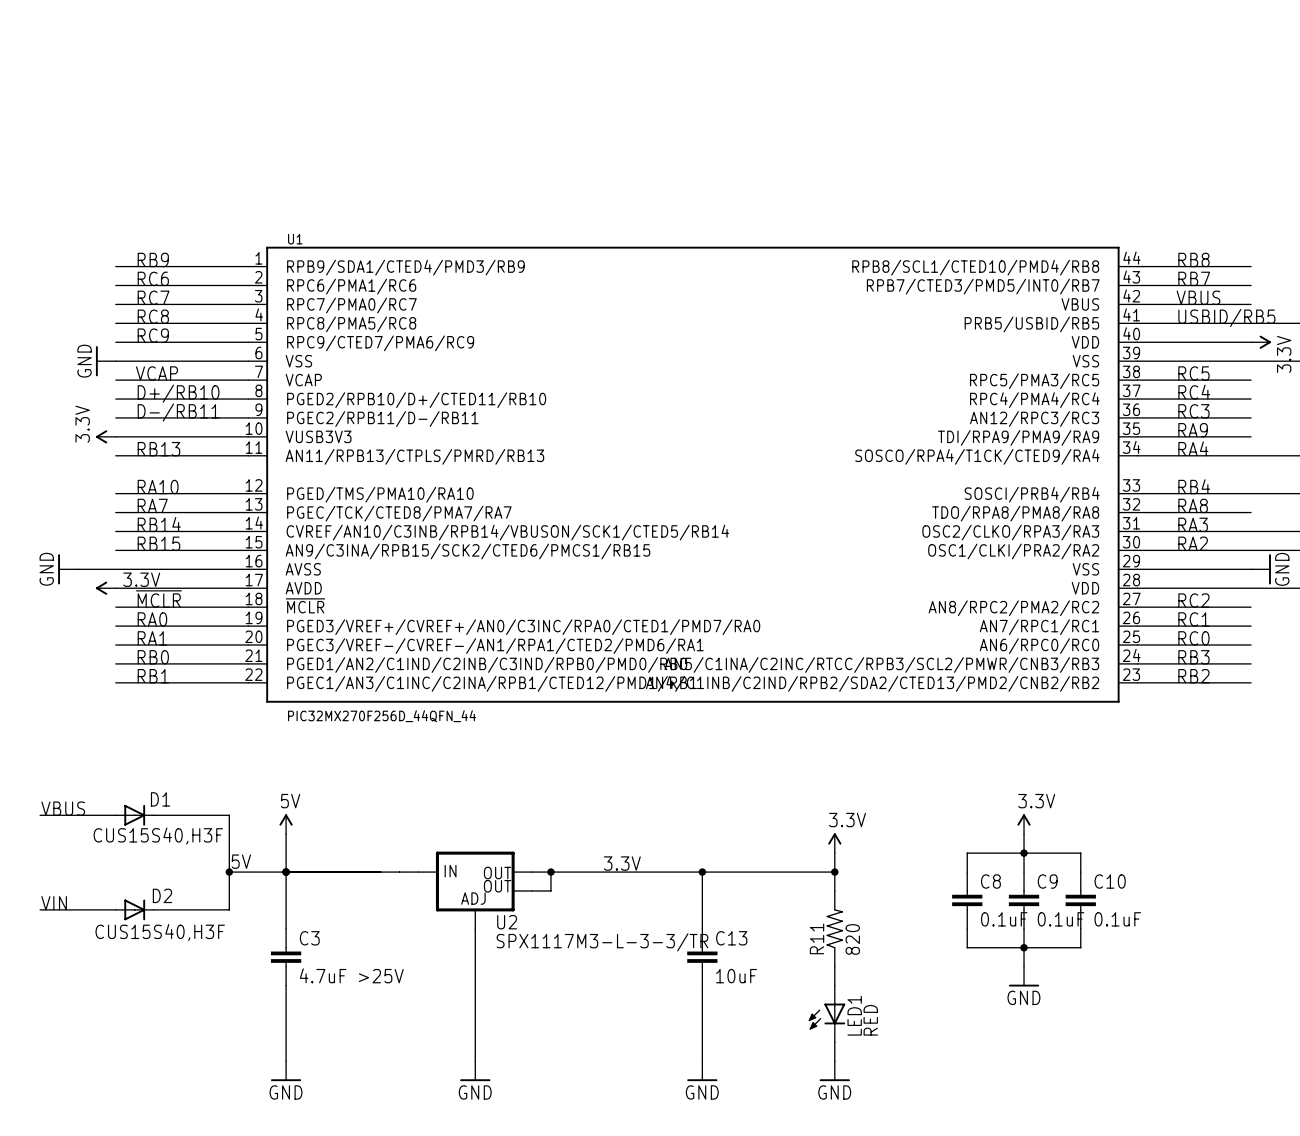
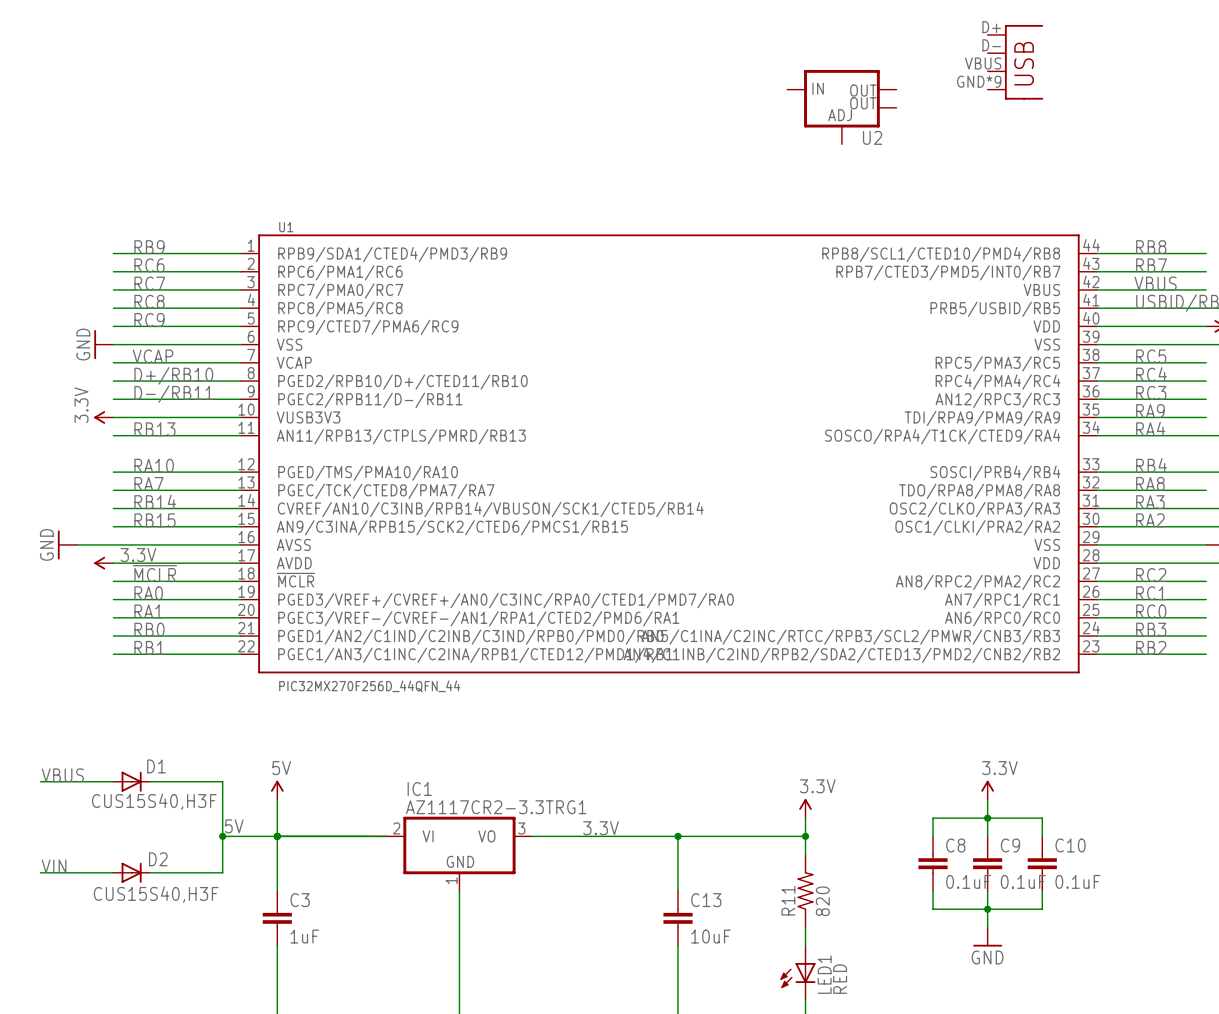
part: none -> (1015, 62)
wire: (532, 872) (550, 872) (550, 890) (532, 890) -> none
junction: (550, 872) -> none
IC1: none -> AZ1117CR2-3.3TRG1 (450, 853)
U2 position: (475, 890) -> (841, 107)
U2 value: SPX1117M3-L-3-3/TR (602, 942) -> none
C3 value: 4.7uF >25V (351, 975) -> 1uF (304, 936)

